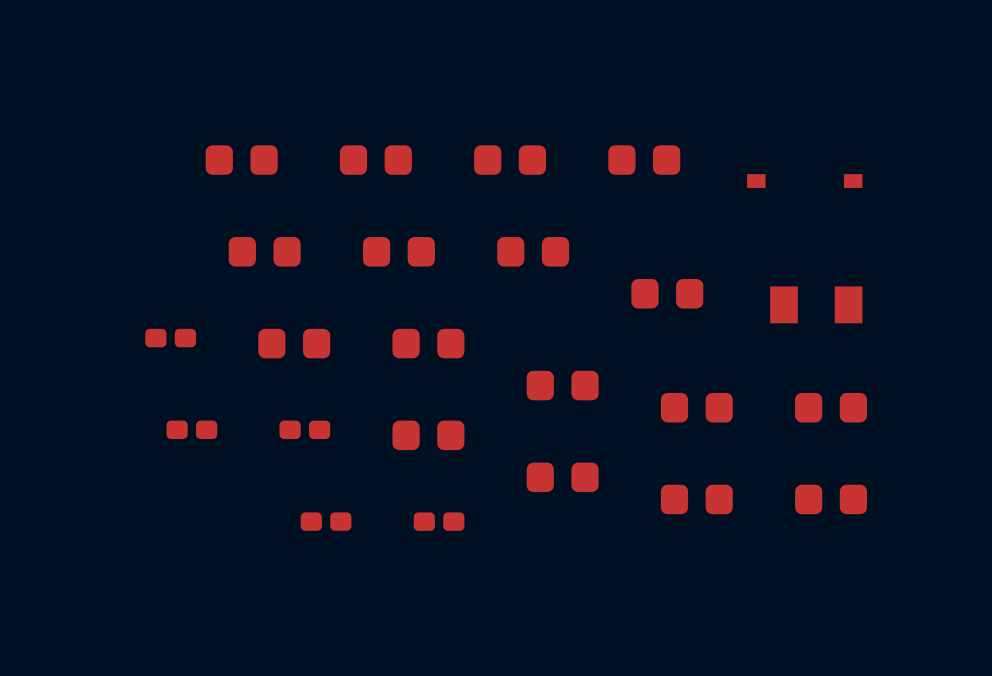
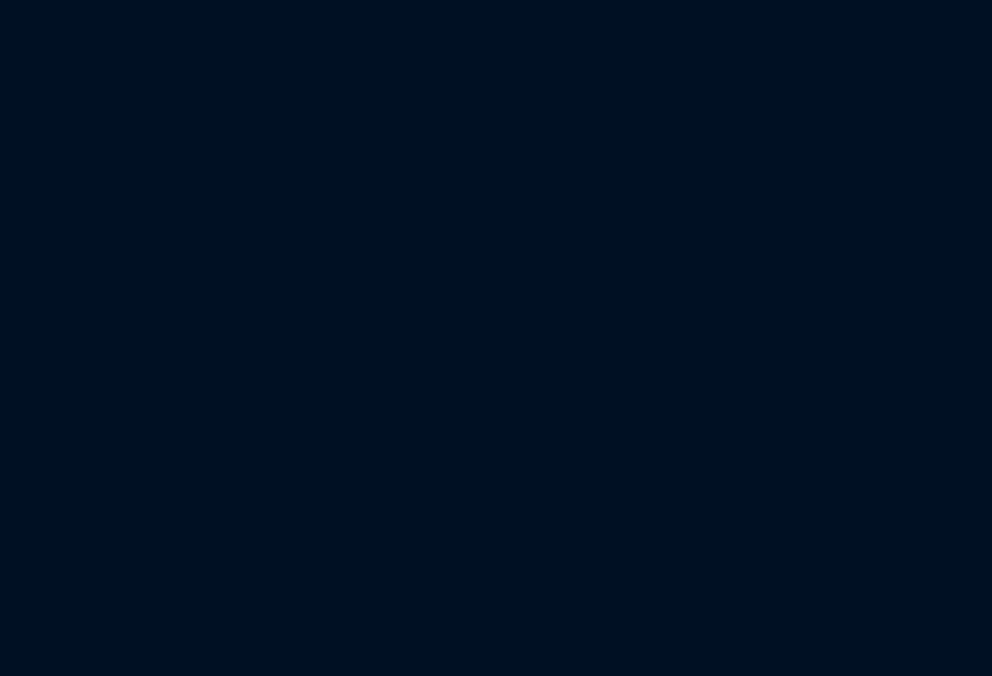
part: (241, 160) -> none
part: (375, 160) -> none
part: (510, 160) -> none
part: (644, 160) -> none
part: (804, 181) -> none
part: (264, 251) -> none
part: (398, 251) -> none
part: (533, 251) -> none
part: (667, 293) -> none
part: (816, 304) -> none
part: (170, 338) -> none
part: (294, 343) -> none
part: (428, 343) -> none
part: (562, 385) -> none
part: (696, 407) -> none
part: (831, 407) -> none
part: (191, 429) -> none
part: (304, 429) -> none
part: (428, 435) -> none
part: (562, 477) -> none
part: (696, 499) -> none
part: (831, 499) -> none
part: (326, 521) -> none
part: (439, 521) -> none

